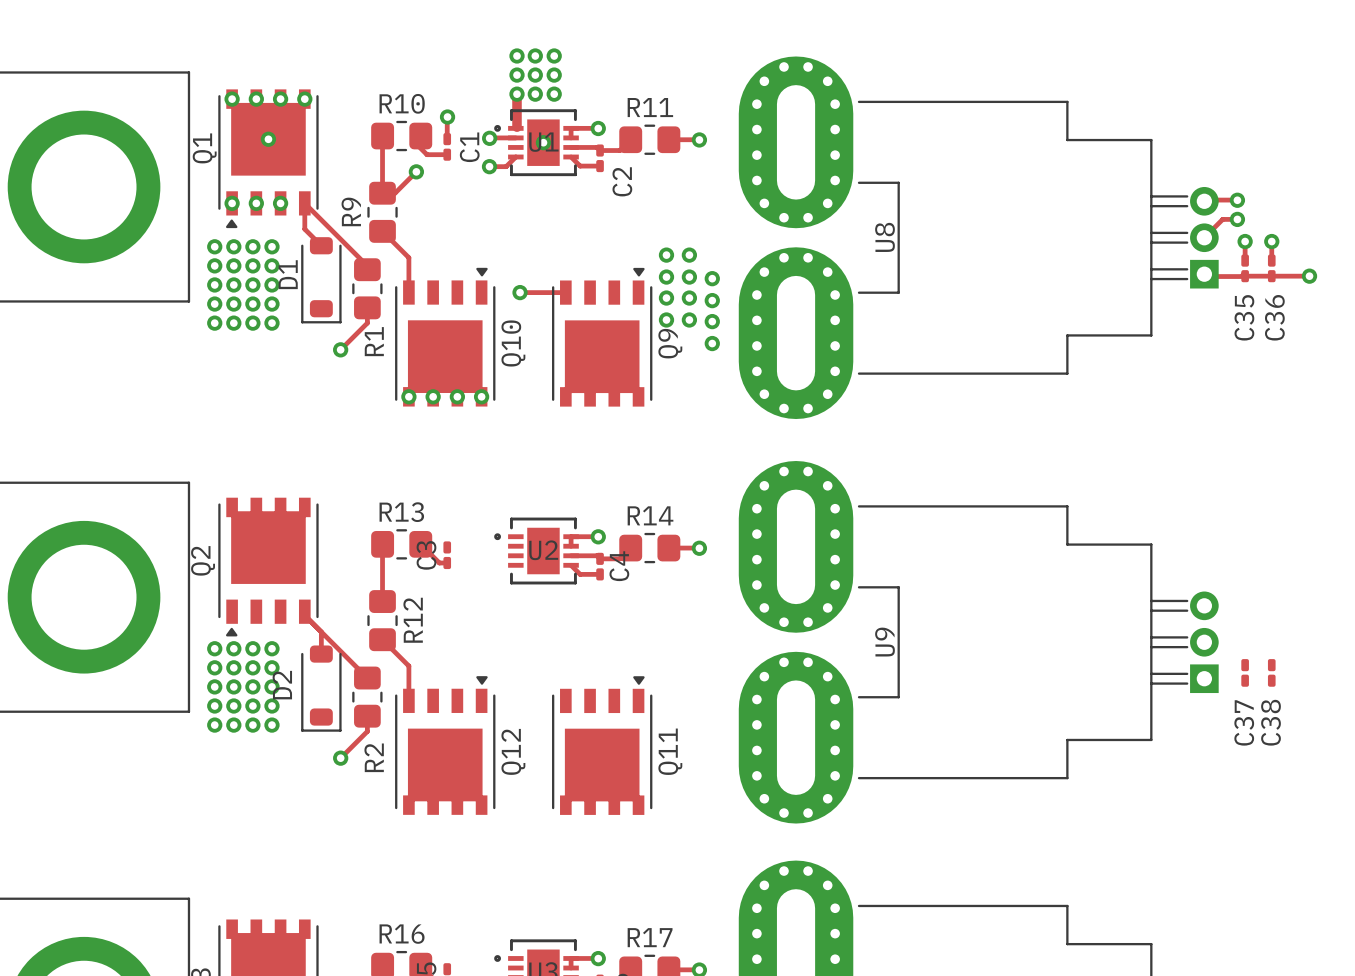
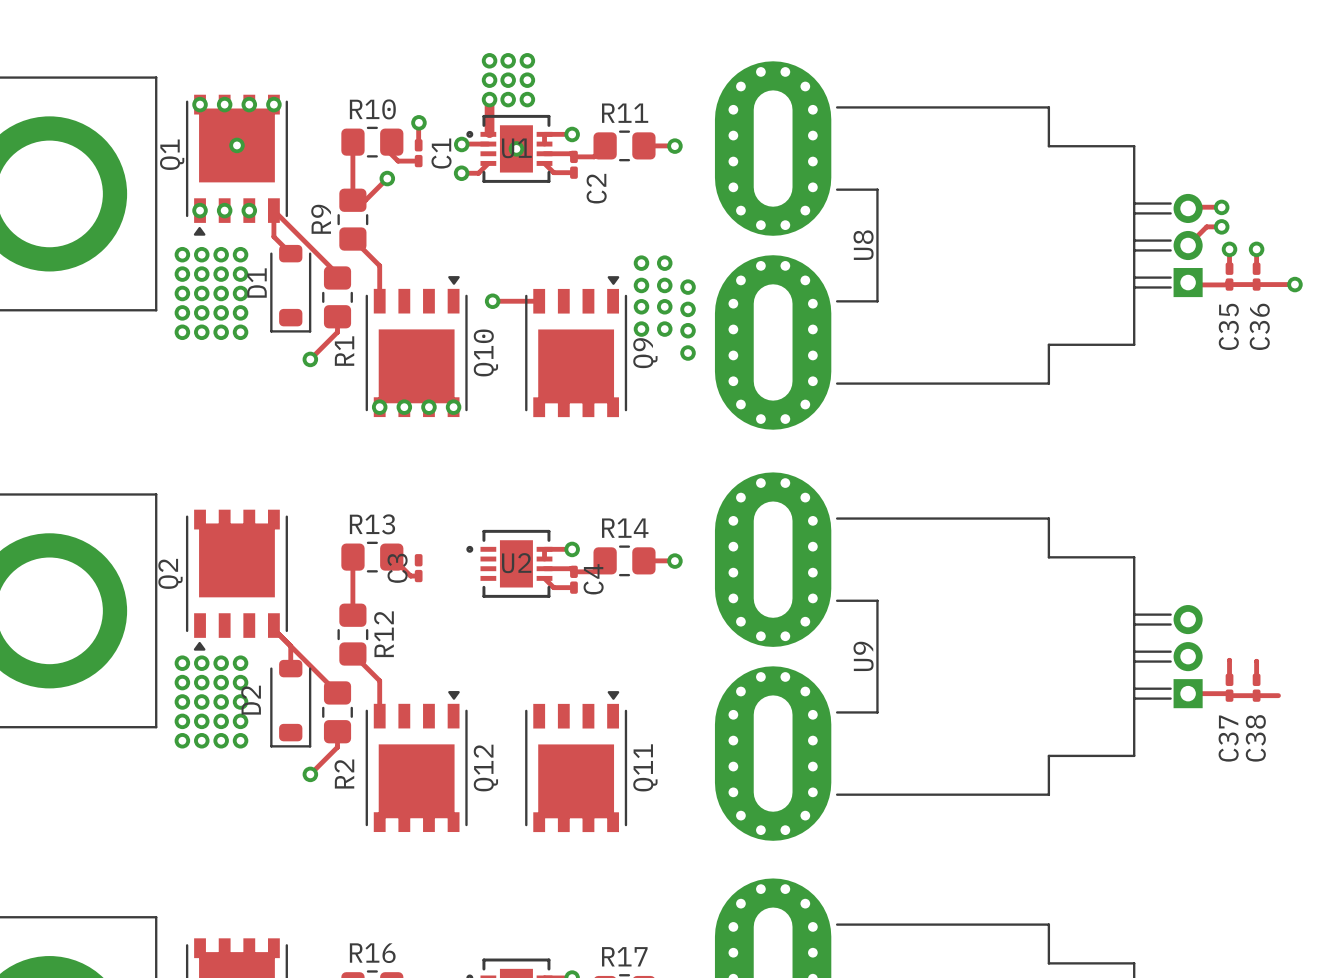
top track: none -> (1229, 660) (1229, 679)
top track: none -> (1256, 661) (1256, 679)
top track: none -> (1188, 693) (1278, 695)

